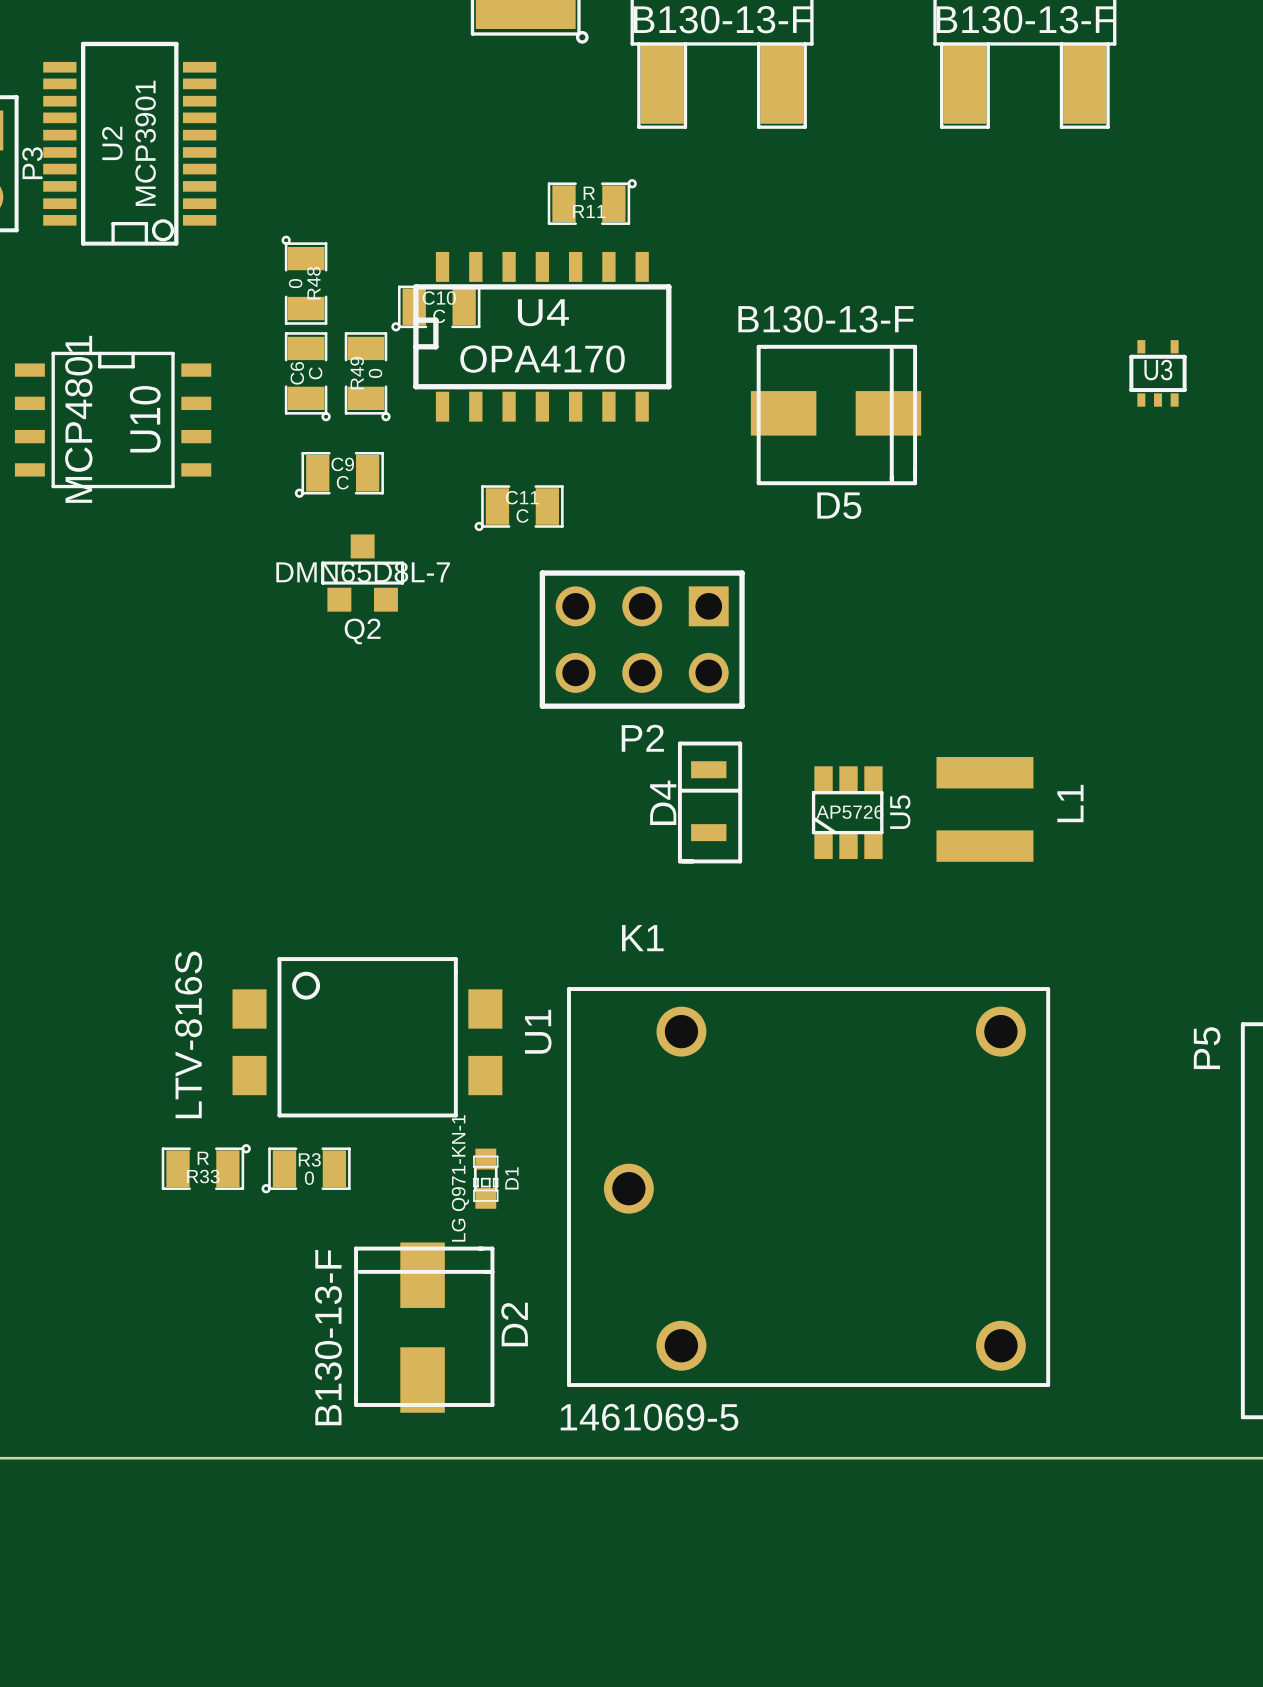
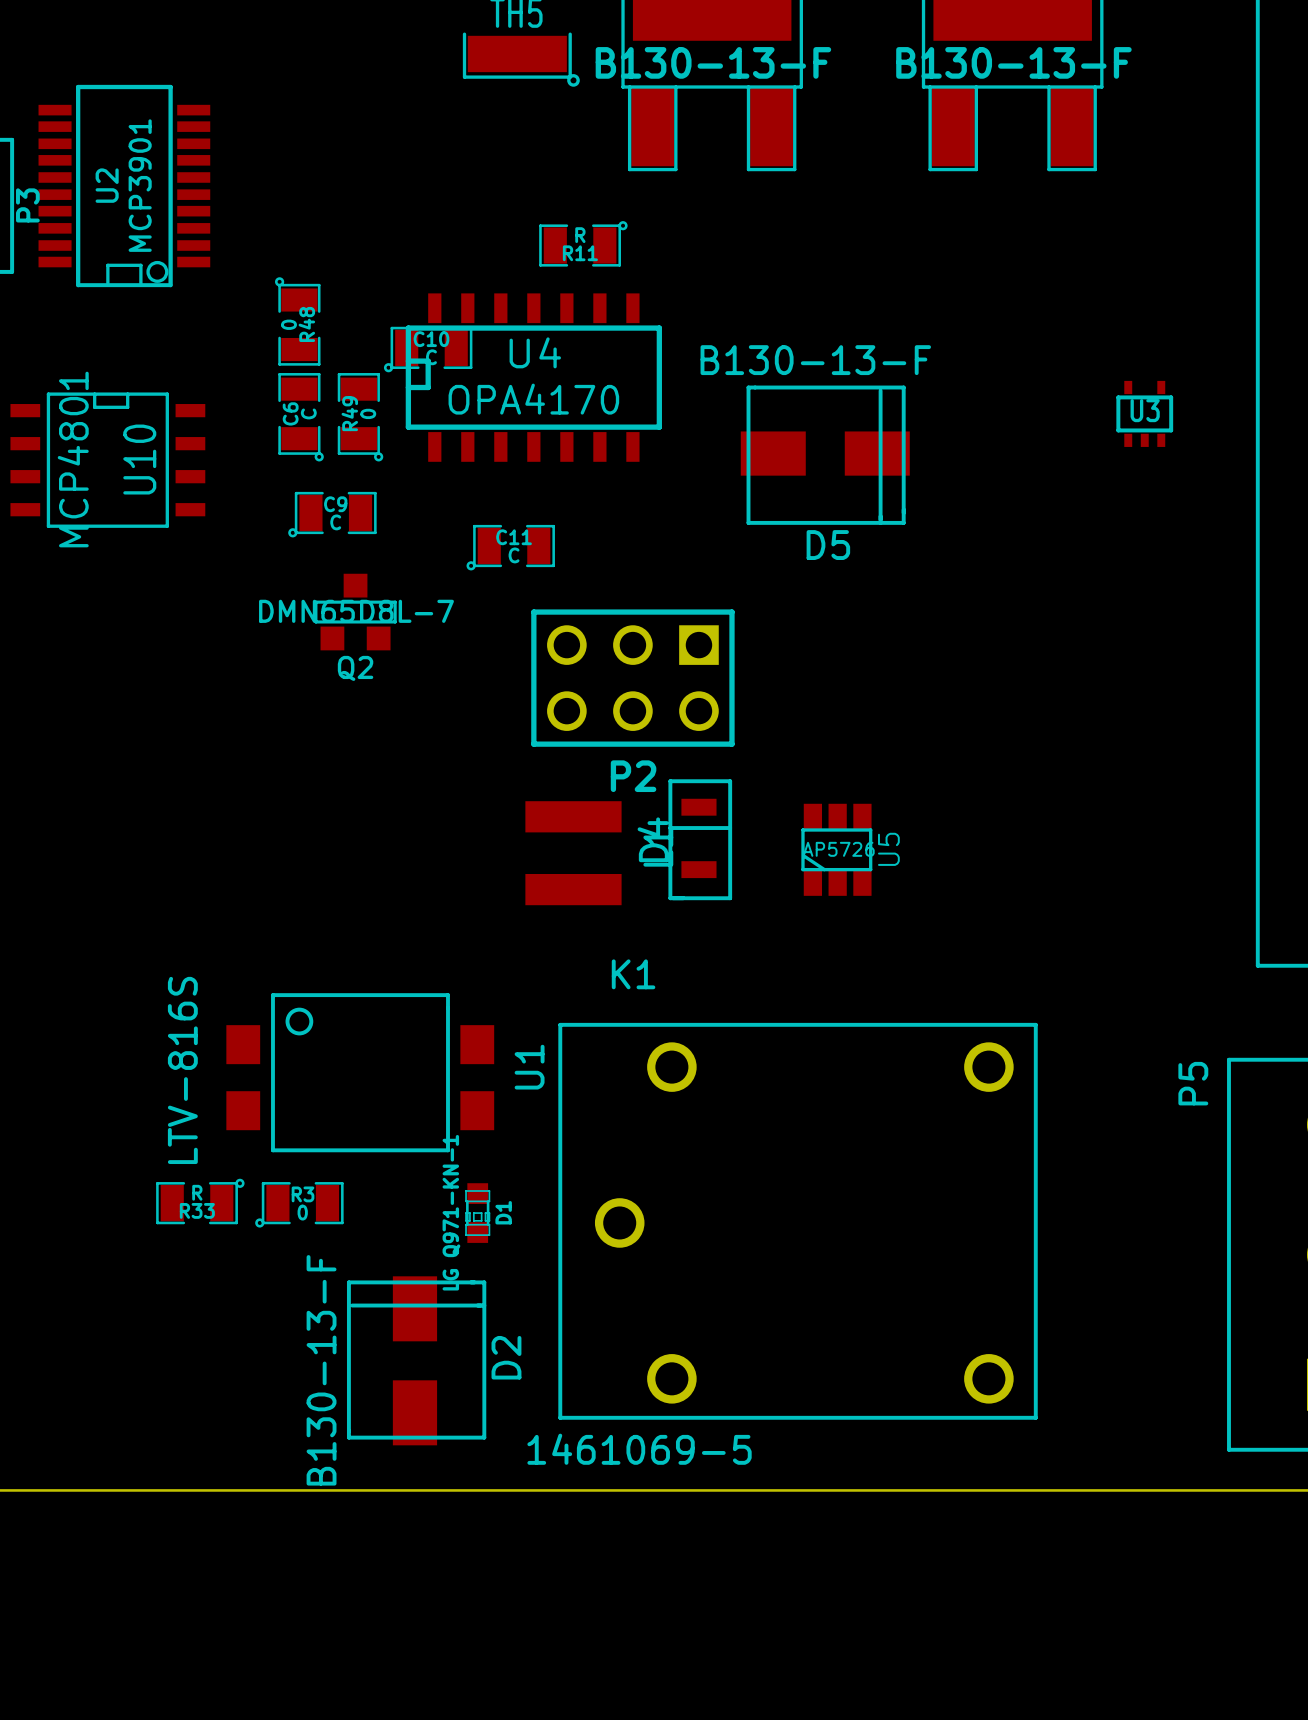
L1 position: (984, 809) -> (573, 853)

